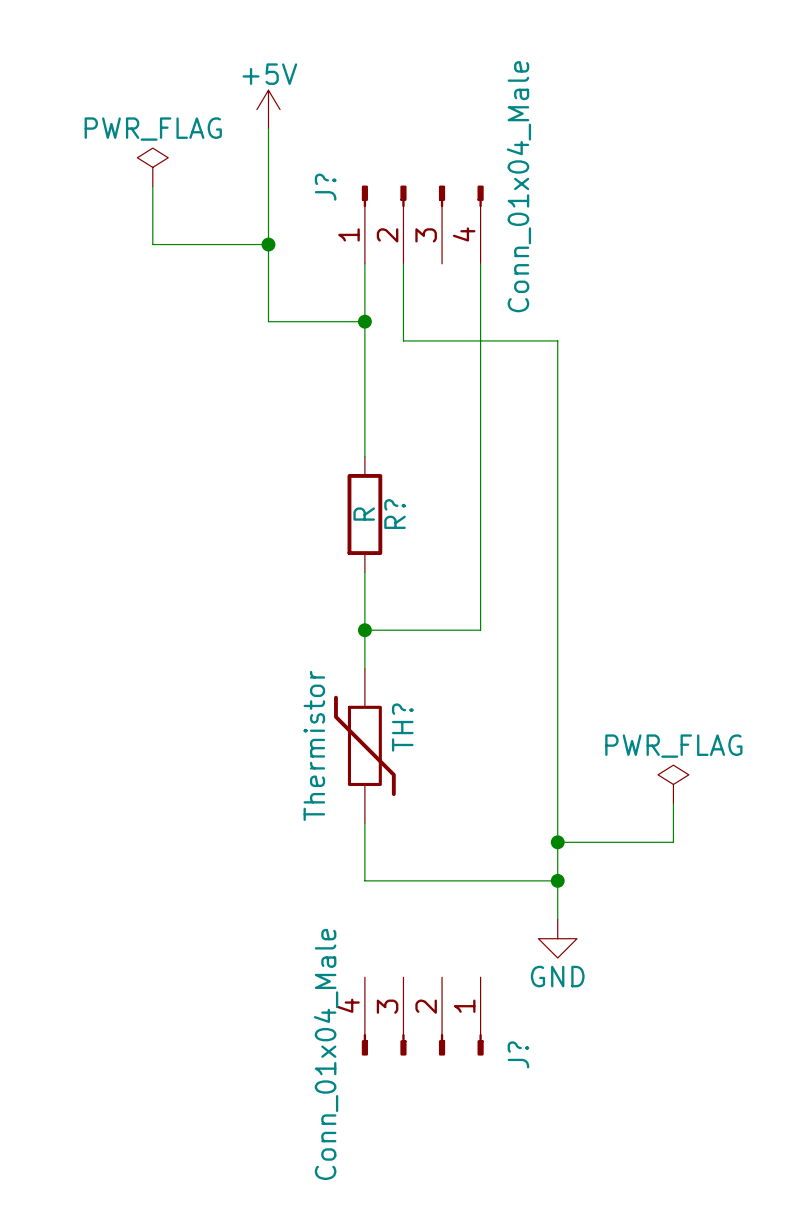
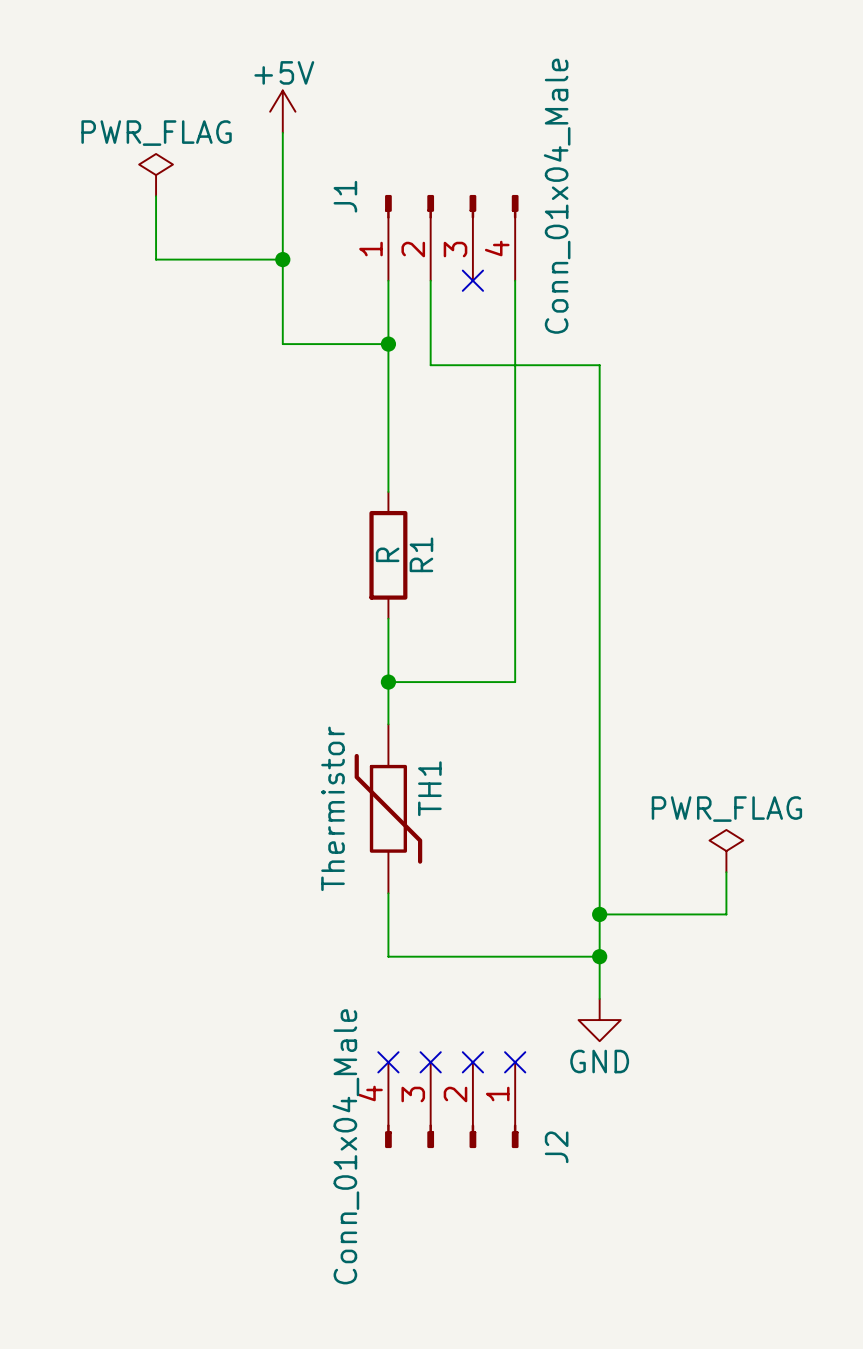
J? name: J? (325, 187) -> J1 (345, 196)
no-connect mark: none -> (472, 280)
R? name: R? (395, 514) -> R1 (421, 554)
TH? name: TH? (402, 727) -> TH1 (429, 788)
no-connect mark: none -> (388, 1062)
no-connect mark: none -> (430, 1062)
no-connect mark: none -> (472, 1062)
no-connect mark: none -> (515, 1062)
J? name: J? (518, 1054) -> J2 (556, 1147)

